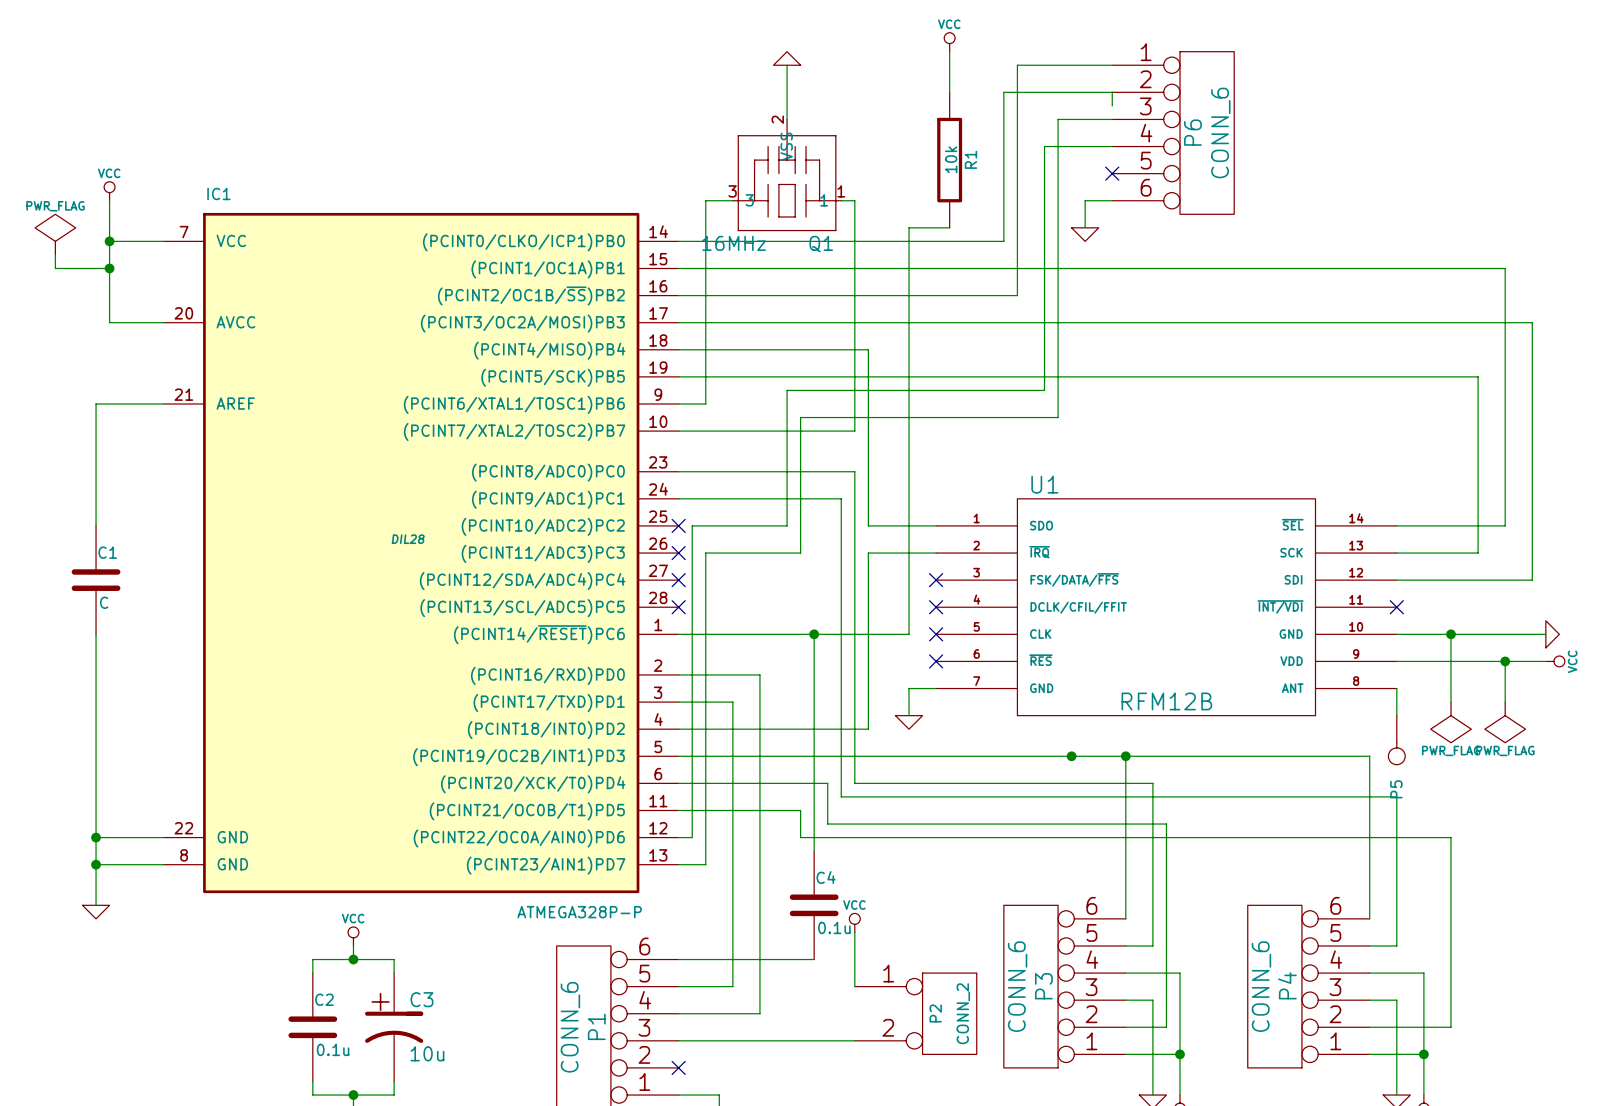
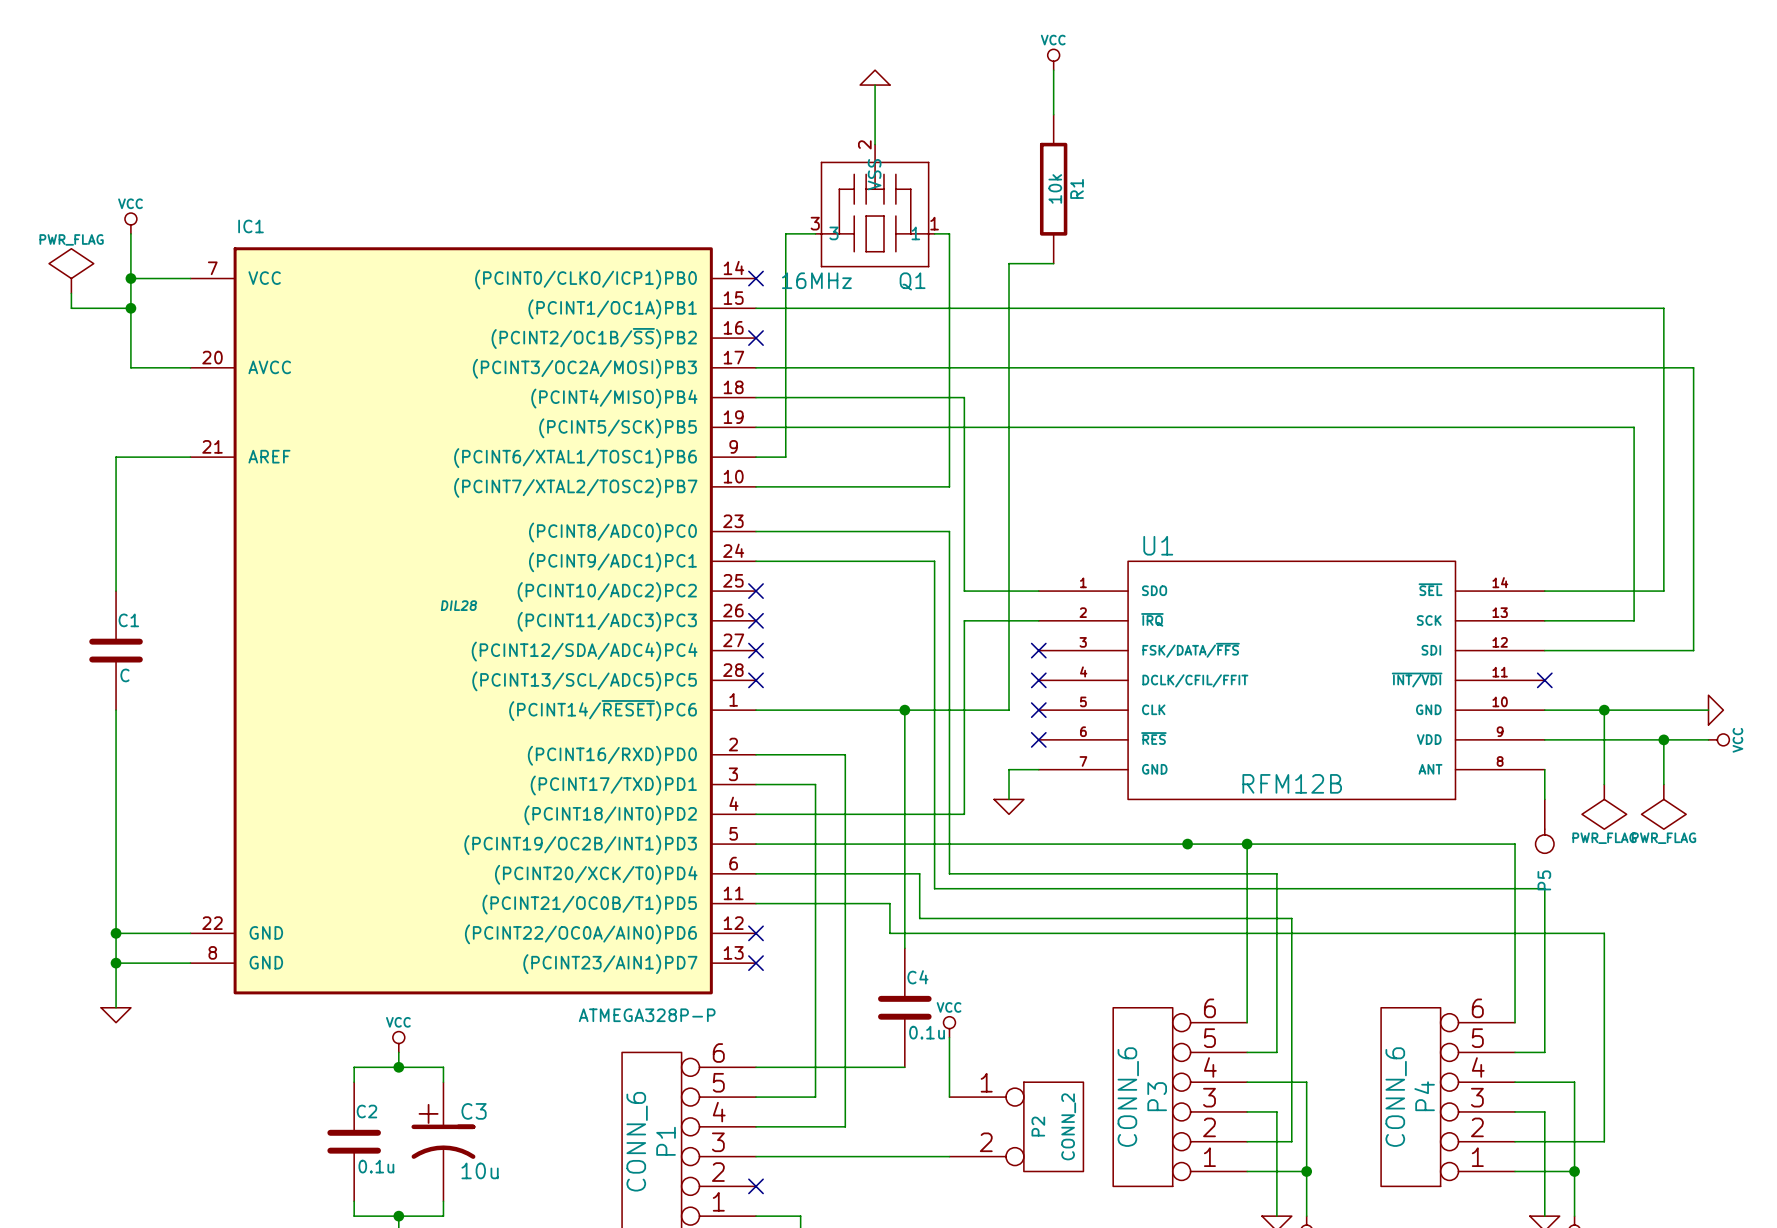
wire: (1112, 65) (1017, 65) (1017, 295) (678, 295) -> none
wire: (1112, 105) (1112, 92) (1003, 92) (1003, 241) (678, 241) -> none
wire: (1112, 119) (1058, 119) (1058, 417) (800, 417) (800, 553) (705, 553) (705, 864) (678, 864) -> none
P6: CONN_6 (1173, 132) -> none
wire: (1112, 146) (1044, 146) (1044, 390) (787, 390) (787, 525) (692, 525) (692, 837) (678, 837) -> none
no-connect mark: (1112, 173) -> none
wire: (1112, 200) (1085, 200) (1085, 227) -> none
power symbol: (1085, 234) -> none
no-connect mark: none -> (756, 278)
no-connect mark: none -> (756, 338)
no-connect mark: none -> (756, 933)
no-connect mark: none -> (756, 963)

